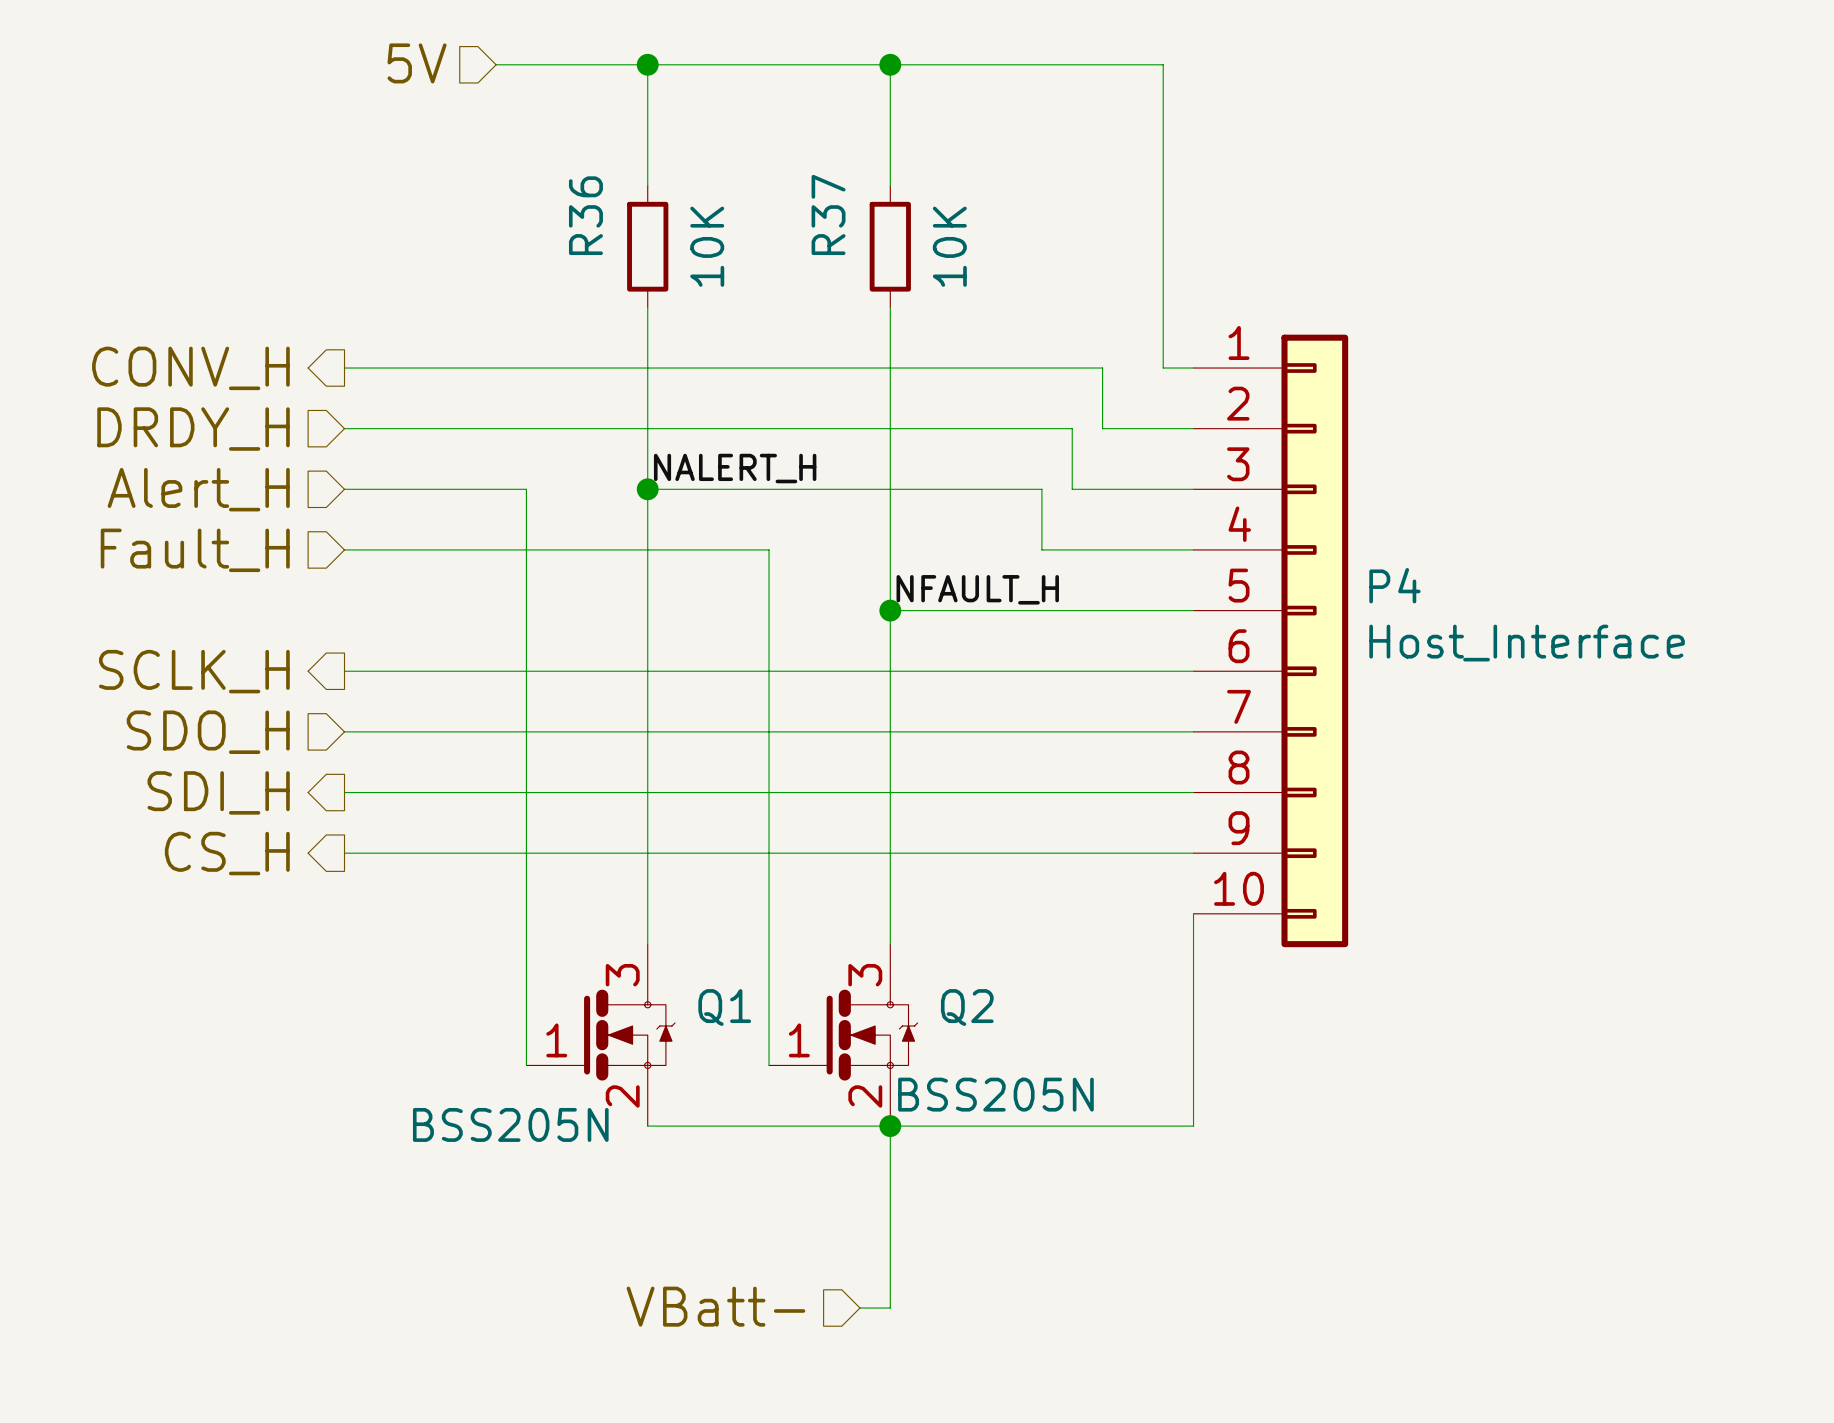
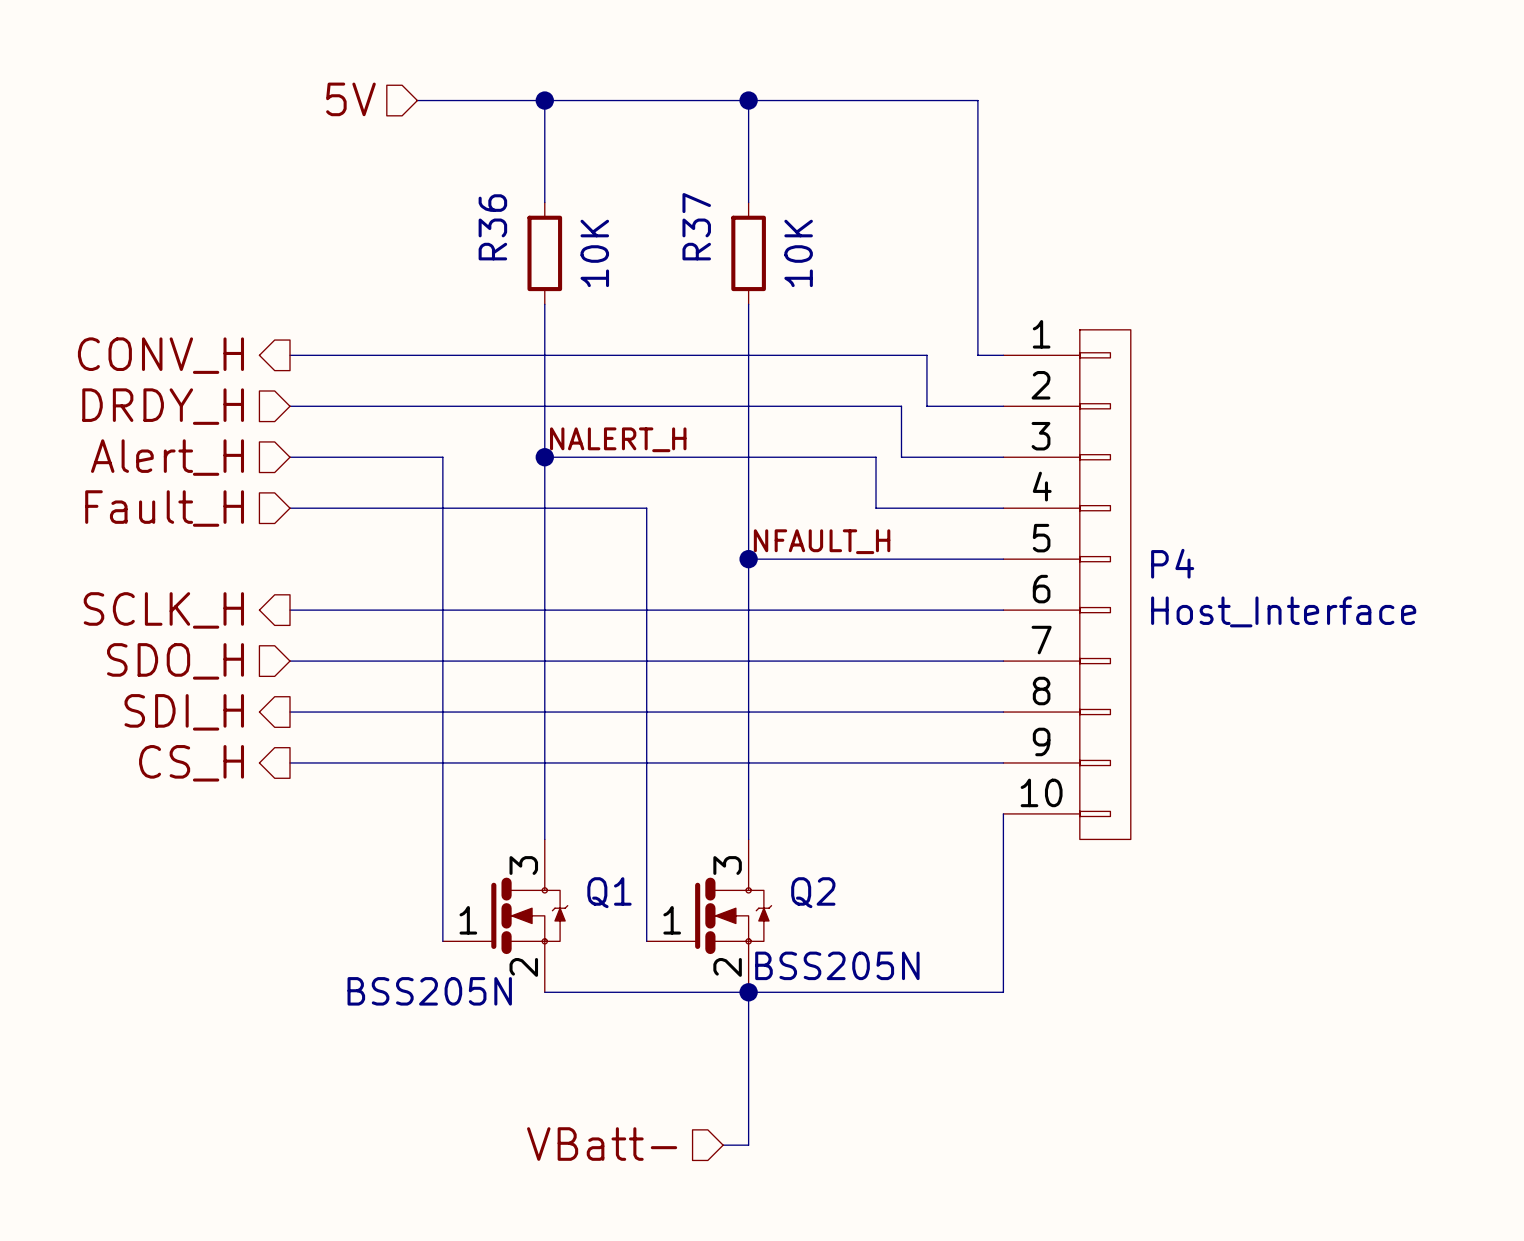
P4 symbol: [1193, 334, 1349, 948] -> [1003, 329, 1131, 840]

